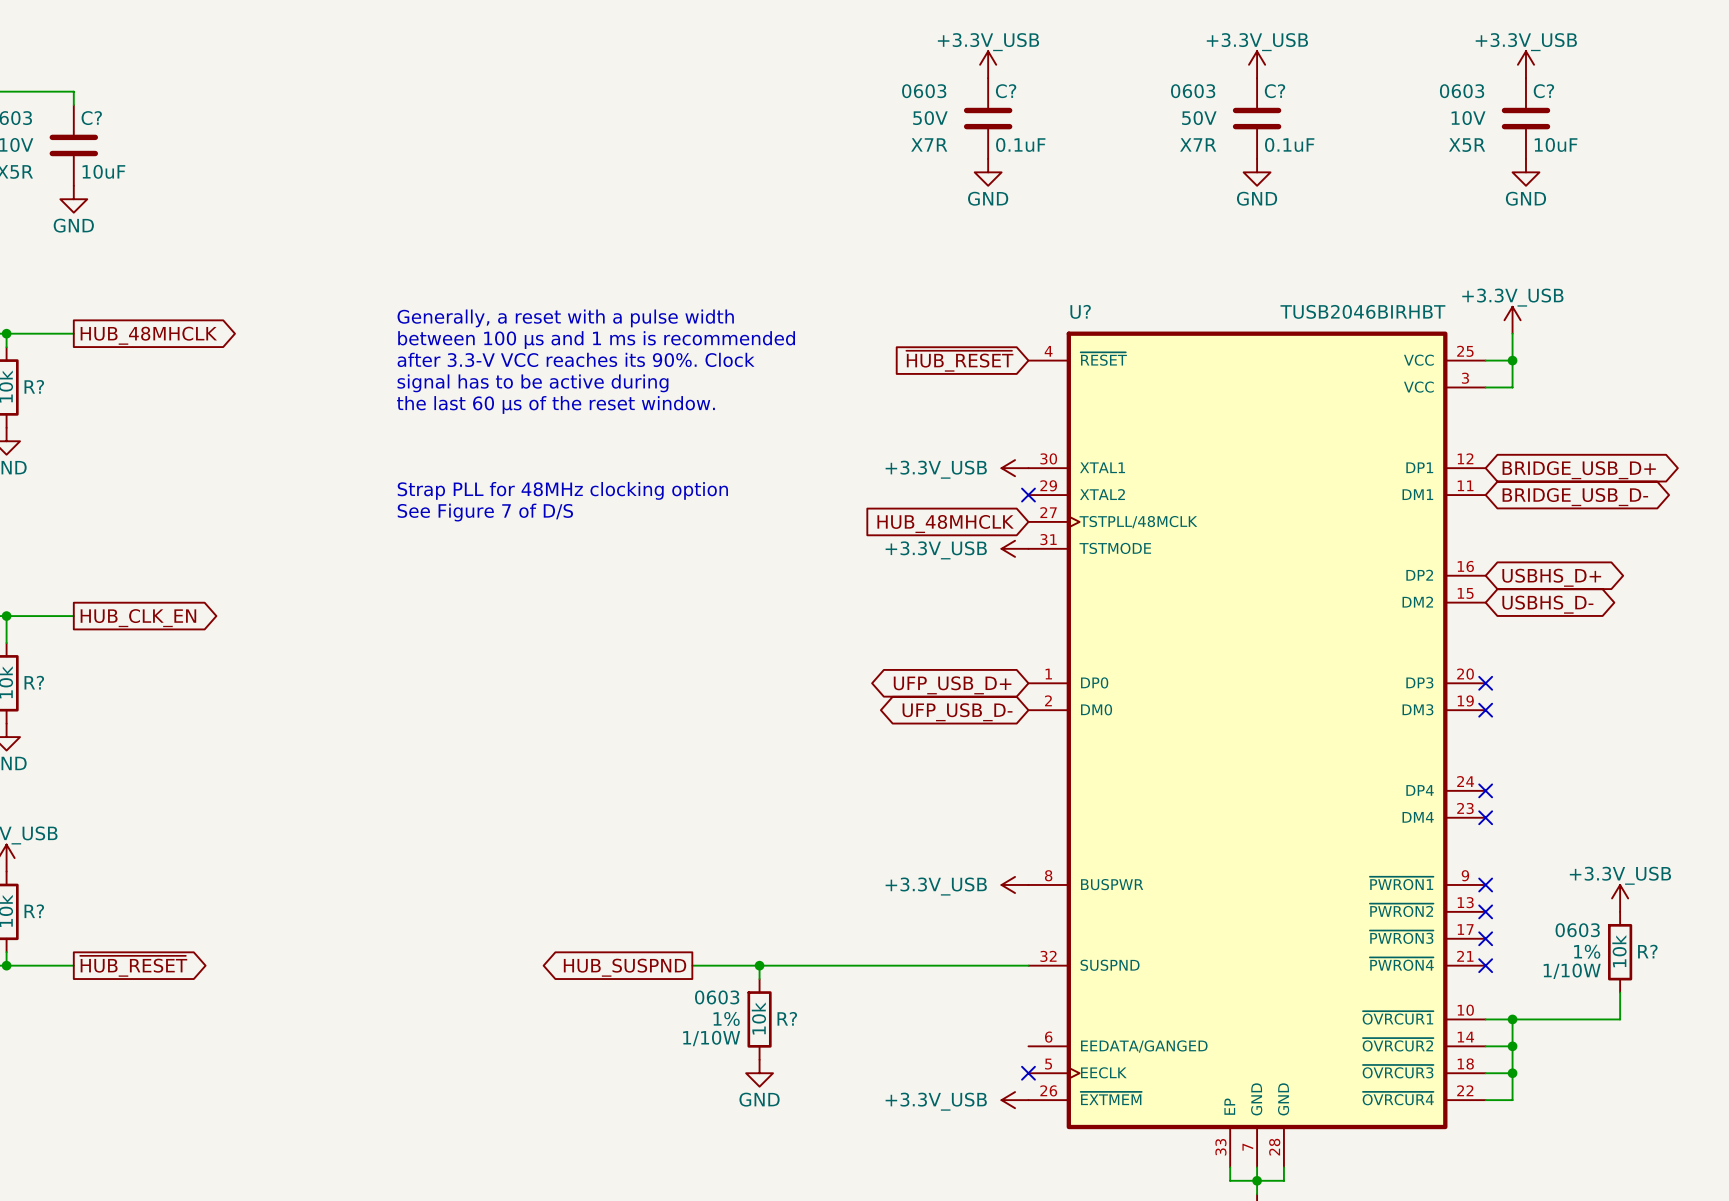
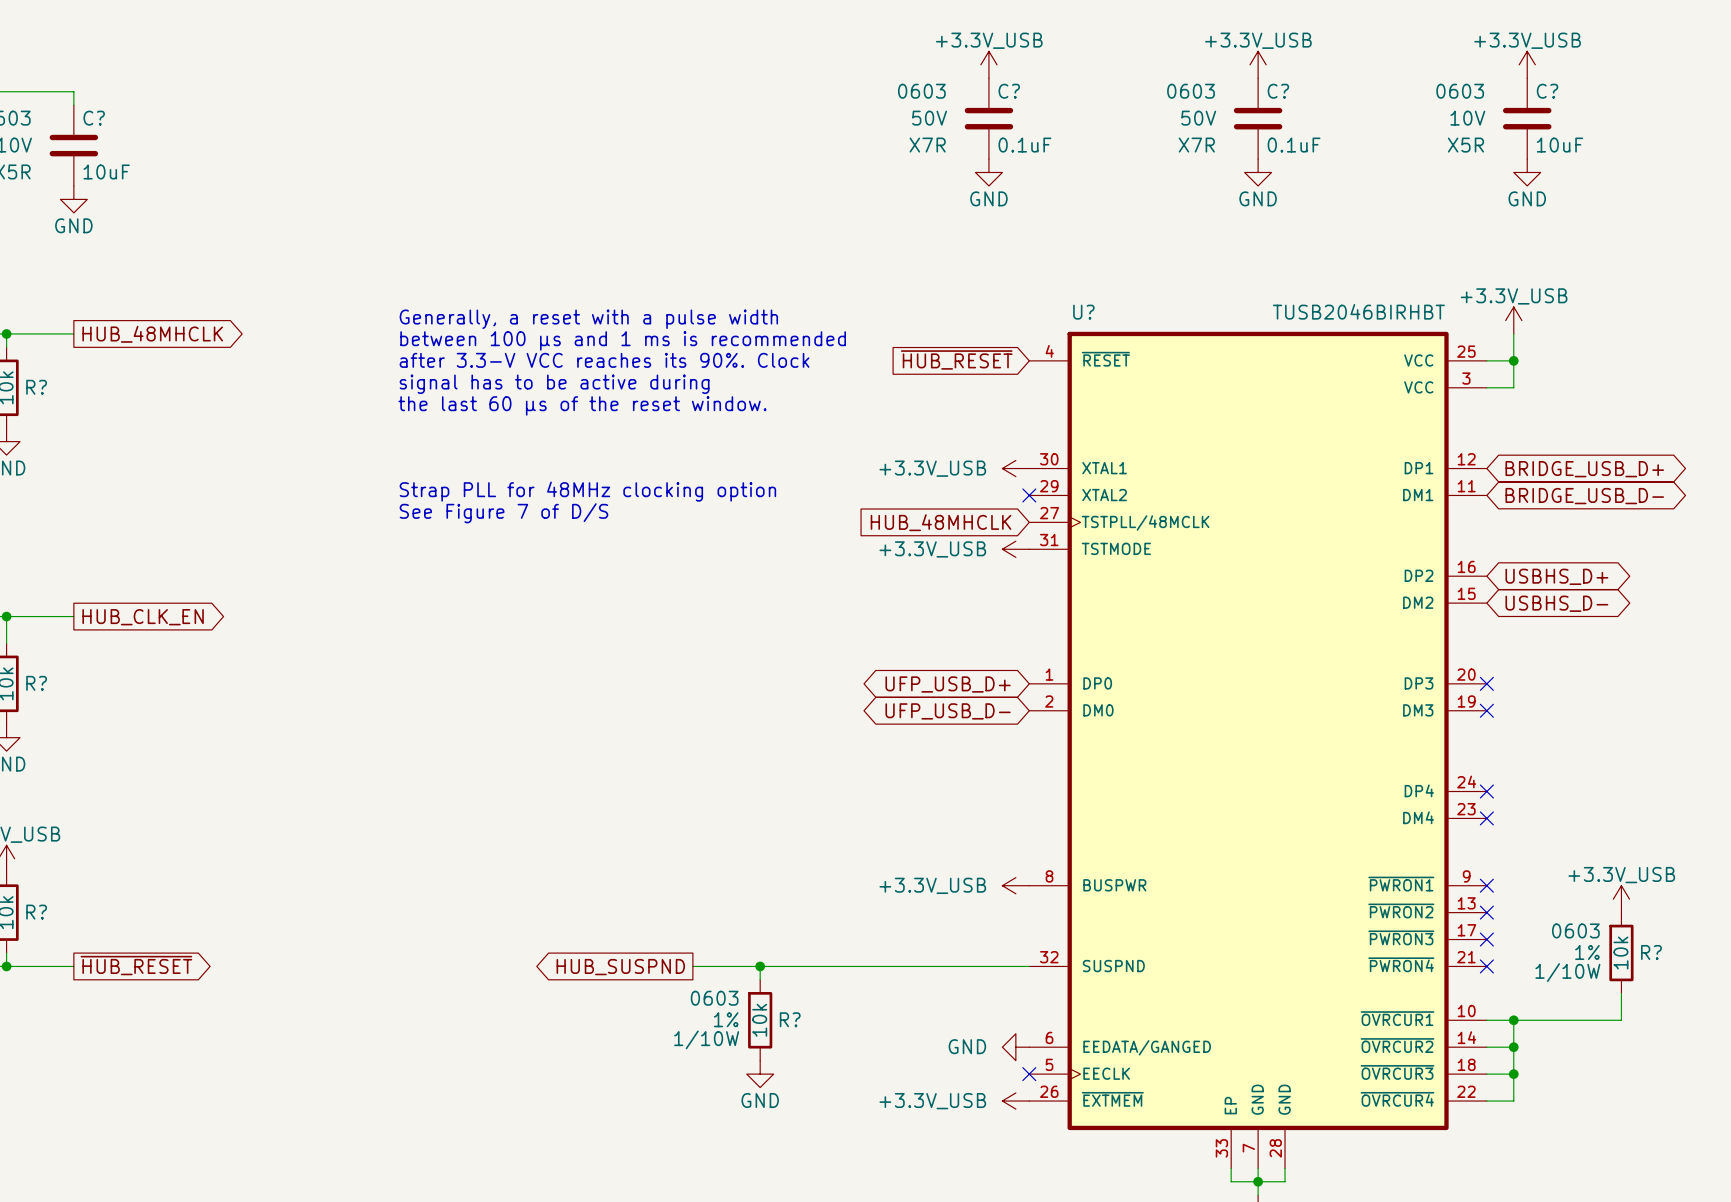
power symbol: none -> GND (1015, 1047)

